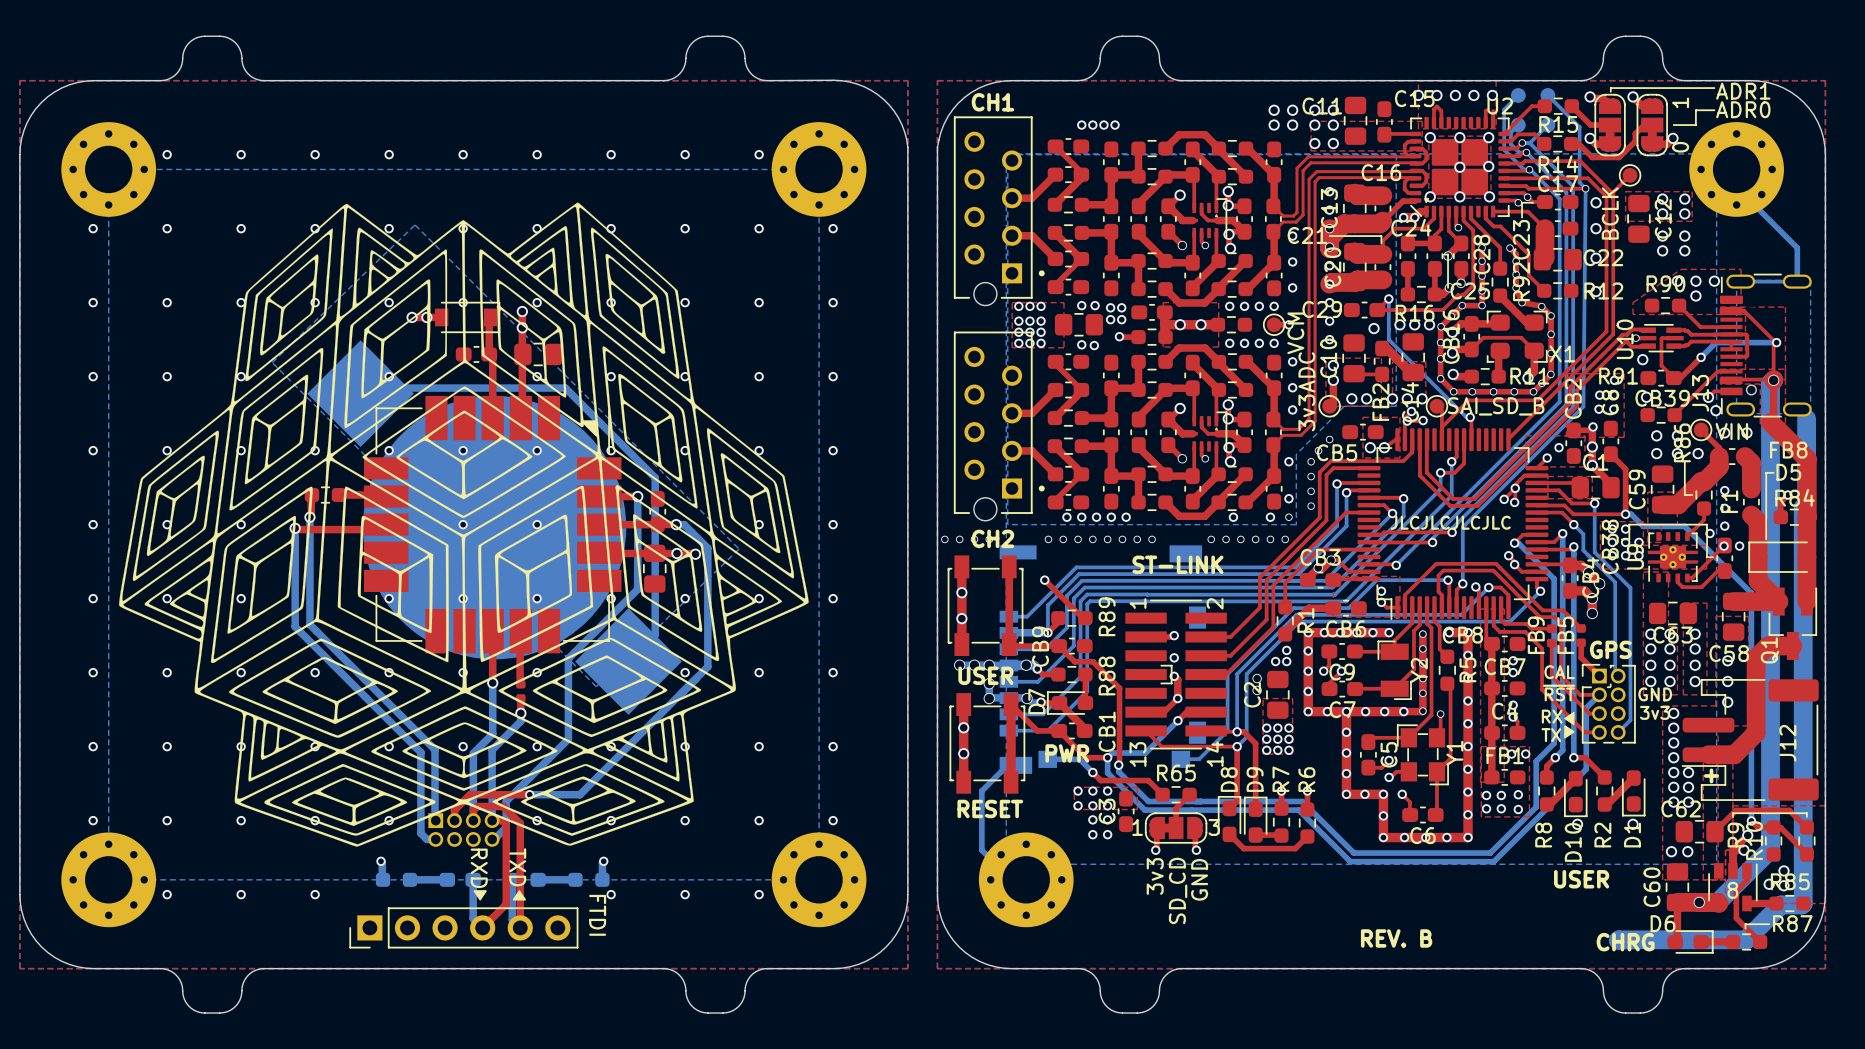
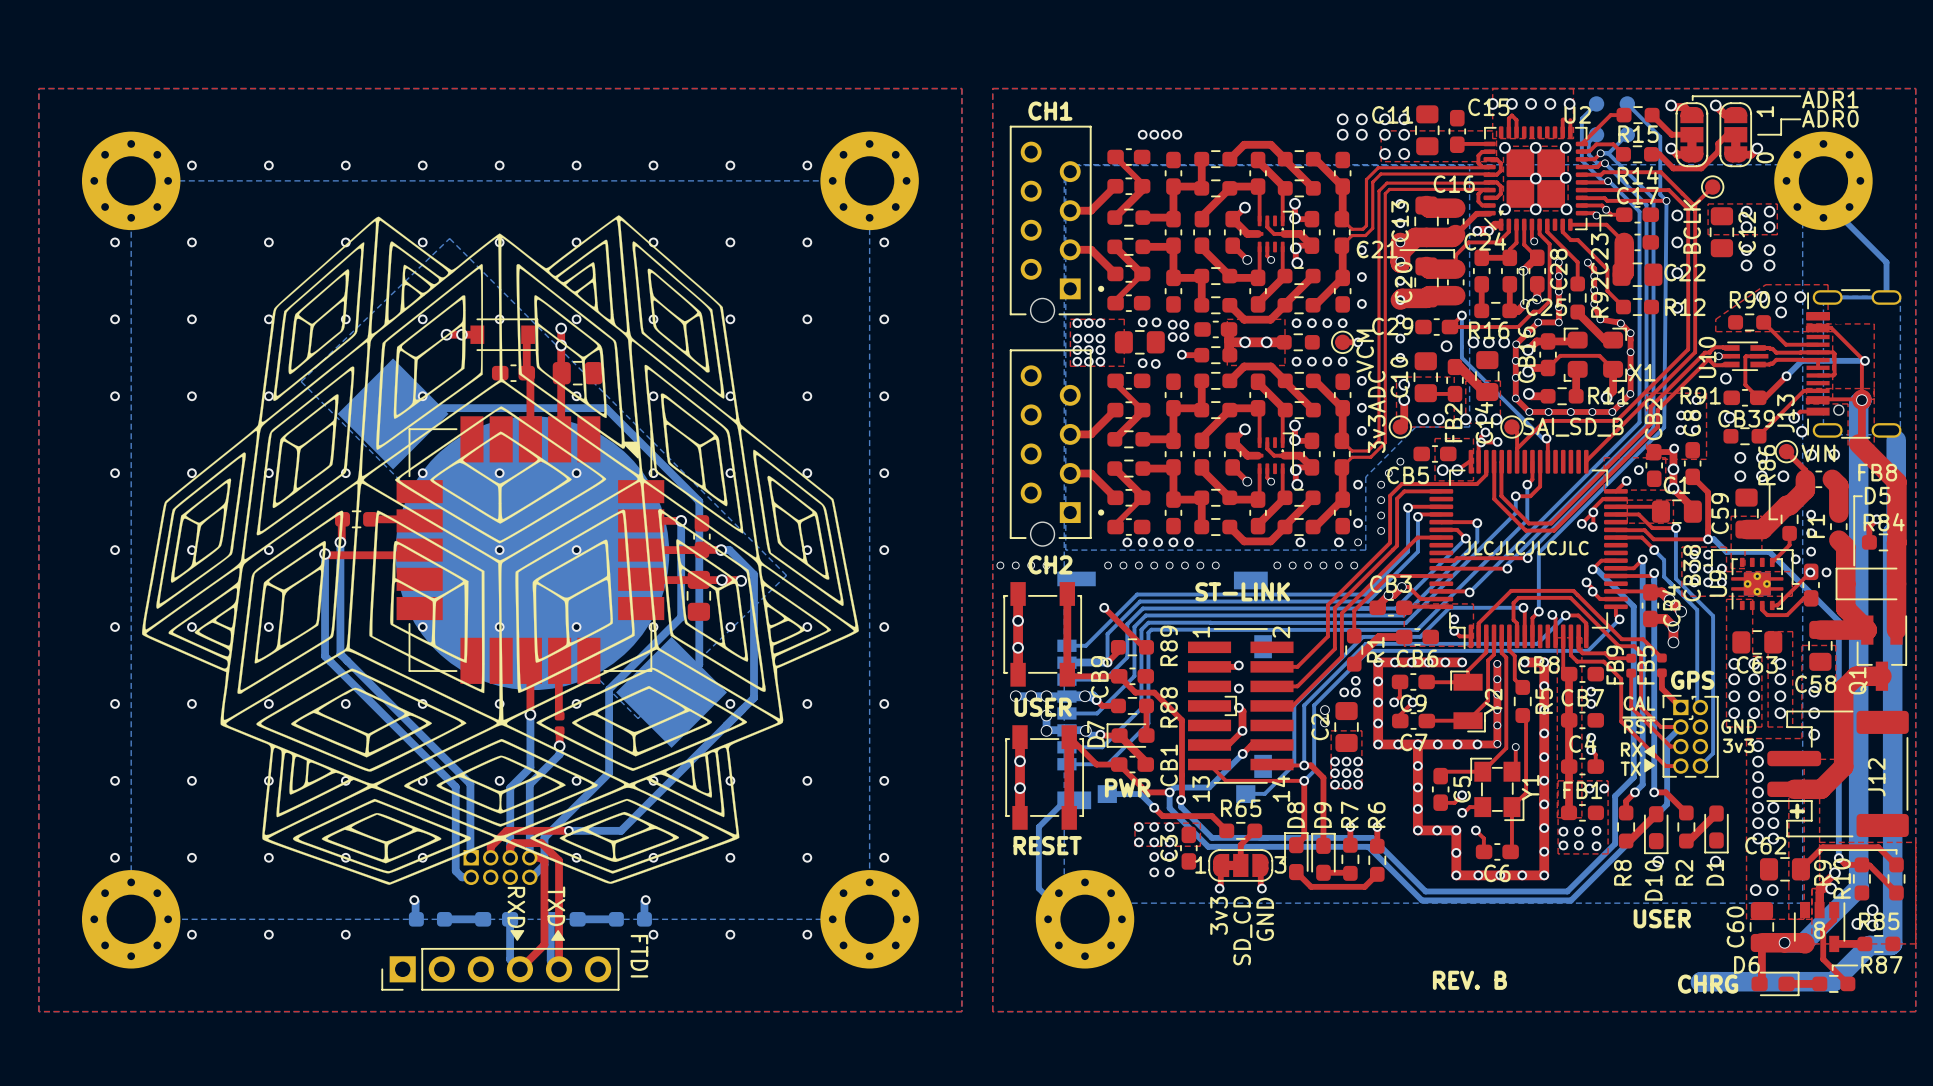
board edge: (204, 36) (222, 36) (233, 40) (240, 49) (242, 64) (246, 71) (255, 78) (264, 80) (666, 80) (674, 77) (681, 71) (685, 64) (687, 49) (694, 40) (705, 36) (725, 36) (733, 39) (740, 44) (748, 69) (758, 78) (849, 81) (871, 90) (883, 99) (894, 111) (904, 131) (907, 147) (907, 894) (906, 911) (900, 926) (891, 940) (879, 952) (858, 964) (842, 968) (758, 970) (748, 979) (740, 1004) (733, 1010) (725, 1012) (705, 1012) (694, 1008) (687, 999) (685, 985) (681, 977) (674, 971) (666, 968) (264, 968) (255, 970) (246, 977) (242, 985) (240, 999) (233, 1008) (222, 1012) (204, 1013) (196, 1011) (187, 1004) (179, 979) (168, 970) (77, 966) (54, 957) (36, 940) (24, 919) (19, 894) (19, 154) (21, 138) (27, 122) (36, 108) (54, 92) (69, 84) (85, 81) (168, 78) (179, 69) (187, 44) (193, 39) (204, 36) -> none
board edge: (1122, 36) (1140, 36) (1150, 40) (1157, 49) (1160, 64) (1164, 71) (1173, 78) (1181, 80) (1584, 80) (1592, 77) (1598, 71) (1602, 64) (1605, 49) (1612, 40) (1622, 36) (1643, 36) (1651, 39) (1658, 44) (1665, 69) (1676, 78) (1767, 82) (1790, 92) (1809, 108) (1821, 130) (1825, 154) (1825, 894) (1823, 911) (1818, 926) (1809, 940) (1797, 952) (1775, 964) (1759, 968) (1676, 970) (1665, 979) (1658, 1004) (1651, 1010) (1643, 1012) (1622, 1012) (1612, 1008) (1605, 999) (1602, 985) (1598, 977) (1592, 971) (1584, 968) (1181, 968) (1173, 970) (1164, 977) (1160, 985) (1157, 999) (1150, 1008) (1140, 1012) (1122, 1013) (1113, 1011) (1104, 1004) (1097, 979) (1086, 970) (994, 966) (972, 957) (953, 940) (941, 919) (937, 894) (937, 147) (941, 131) (948, 116) (958, 103) (971, 92) (986, 84) (1003, 81) (1086, 78) (1097, 69) (1104, 44) (1111, 39) (1122, 36) -> none

